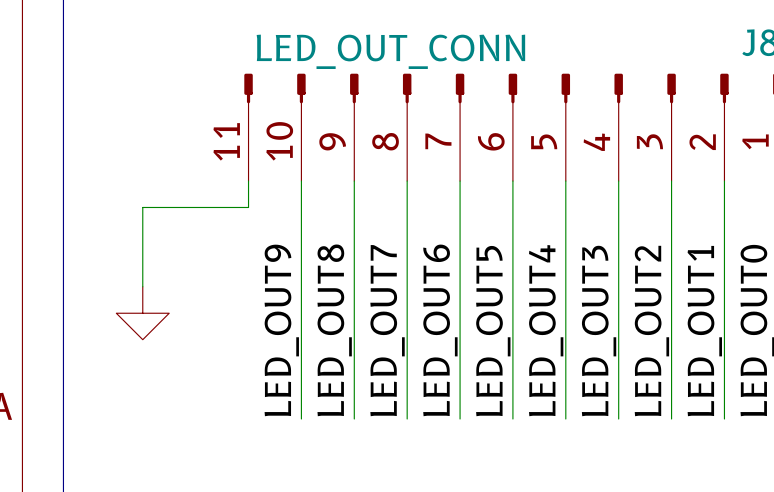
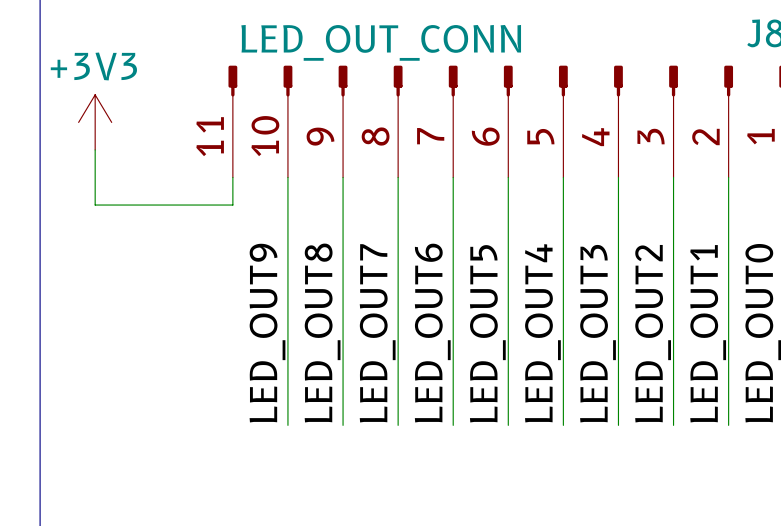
power symbol: none -> +3V3 (95, 122)
wire: (142, 207) (142, 286) -> (122, 205) (95, 205) (95, 149)
power symbol: (142, 313) -> none

